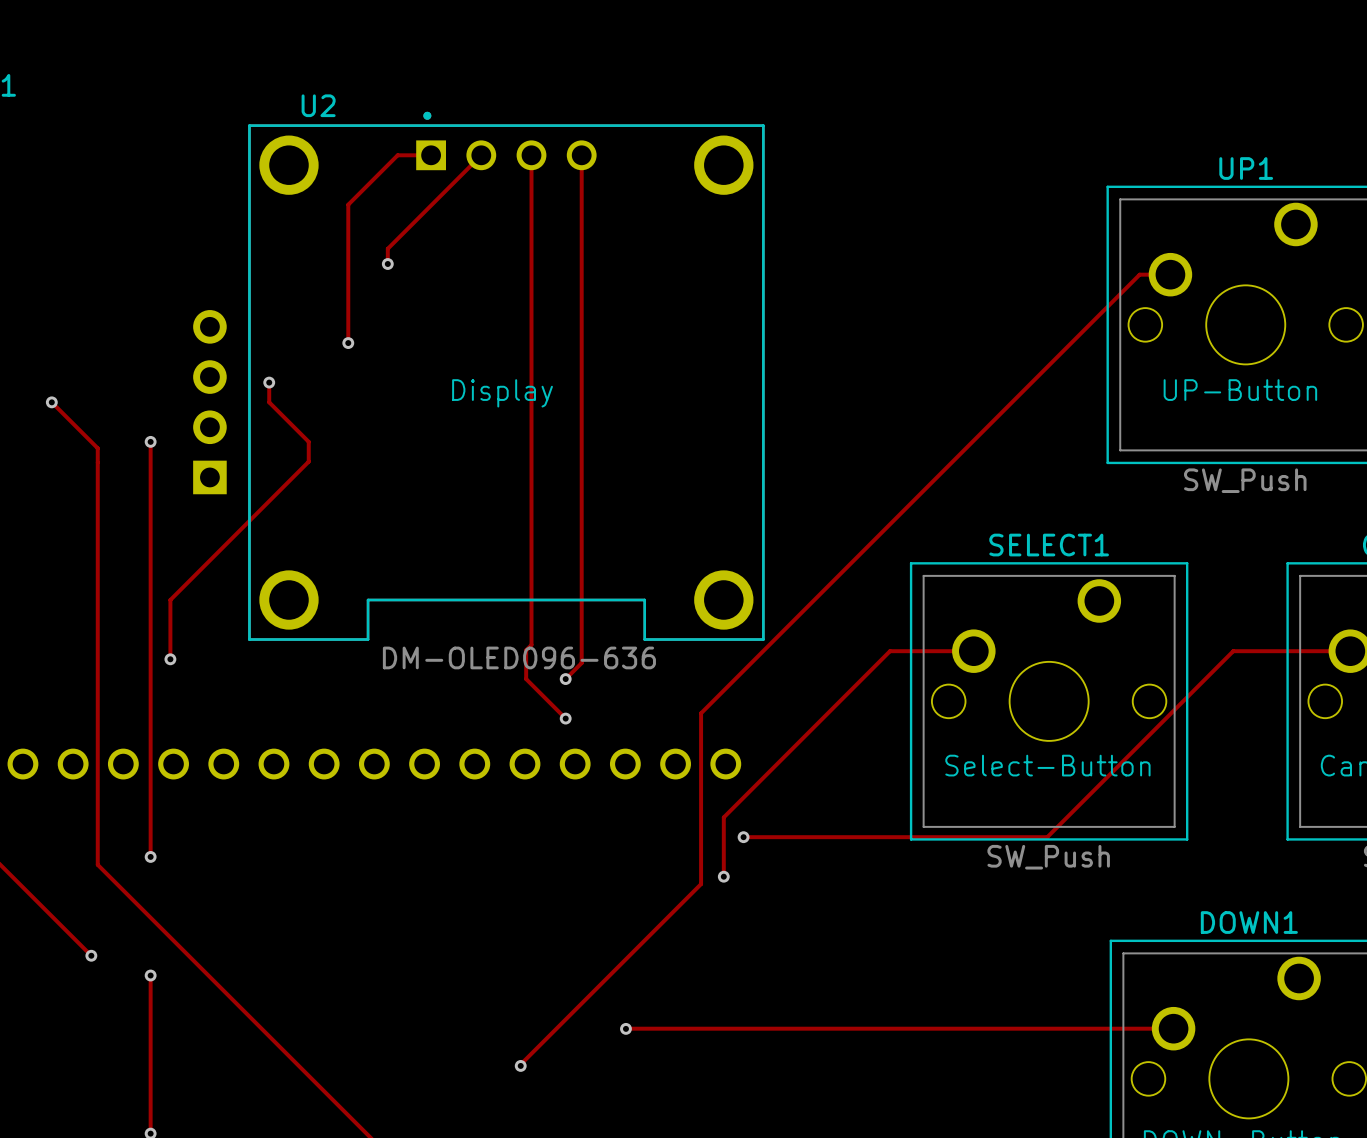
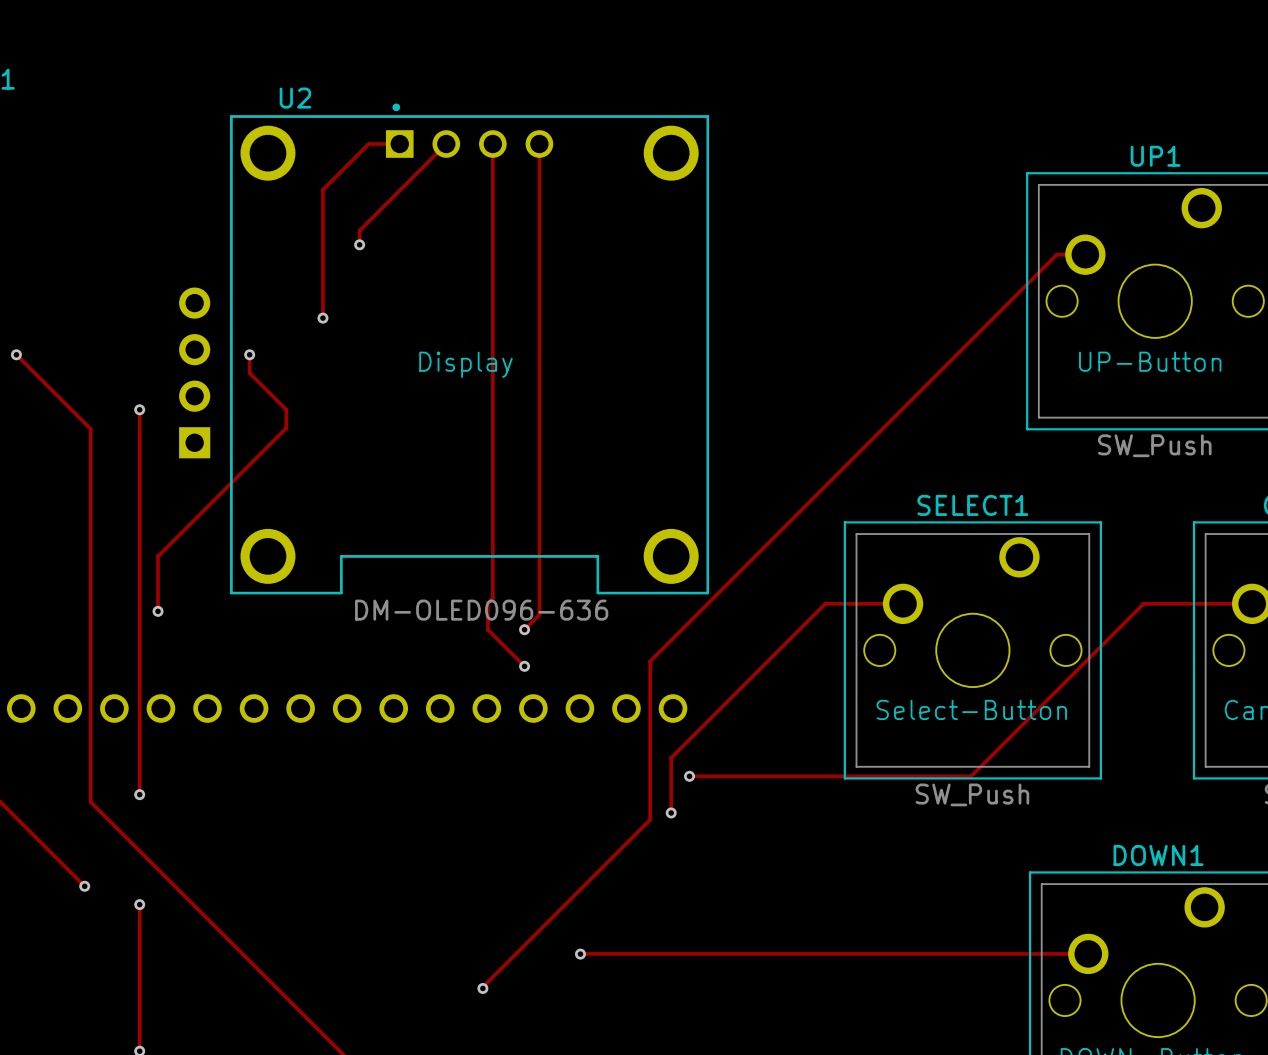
track: (51, 402) (97, 448) (97, 462) -> (16, 354) (90, 429)
via position: (51, 402) -> (16, 354)

